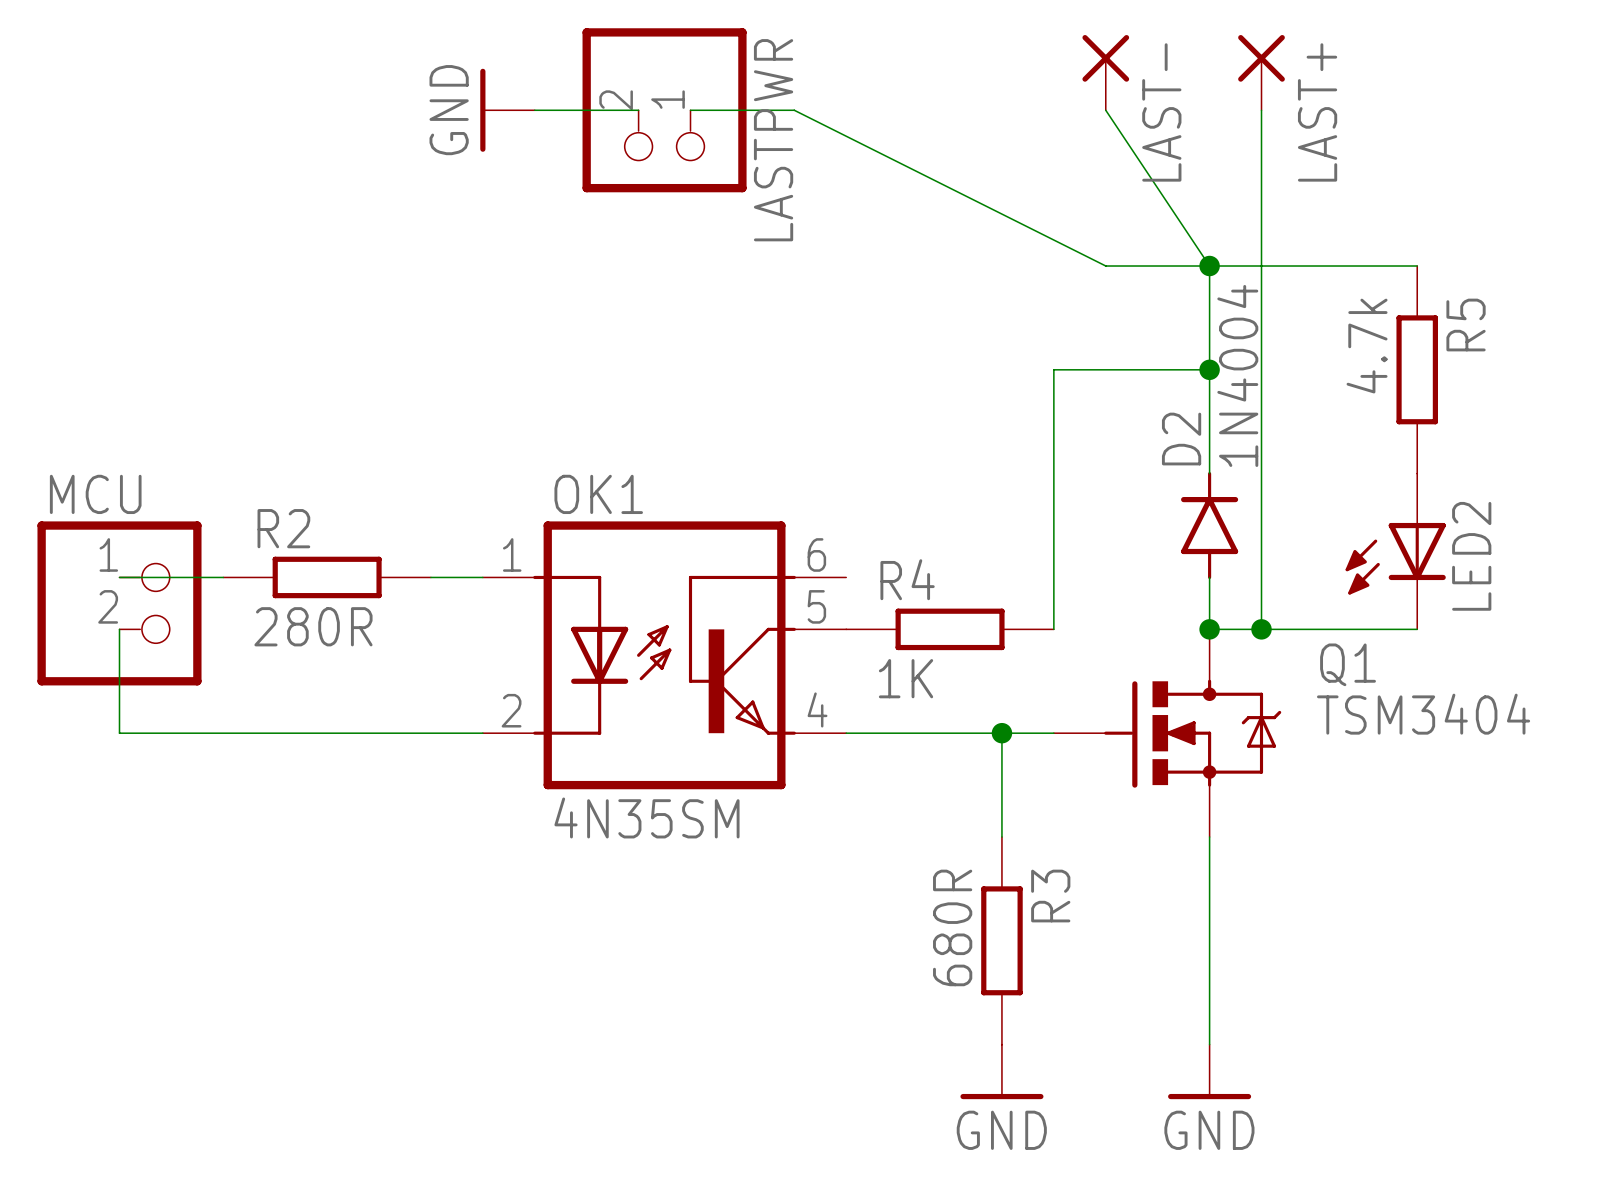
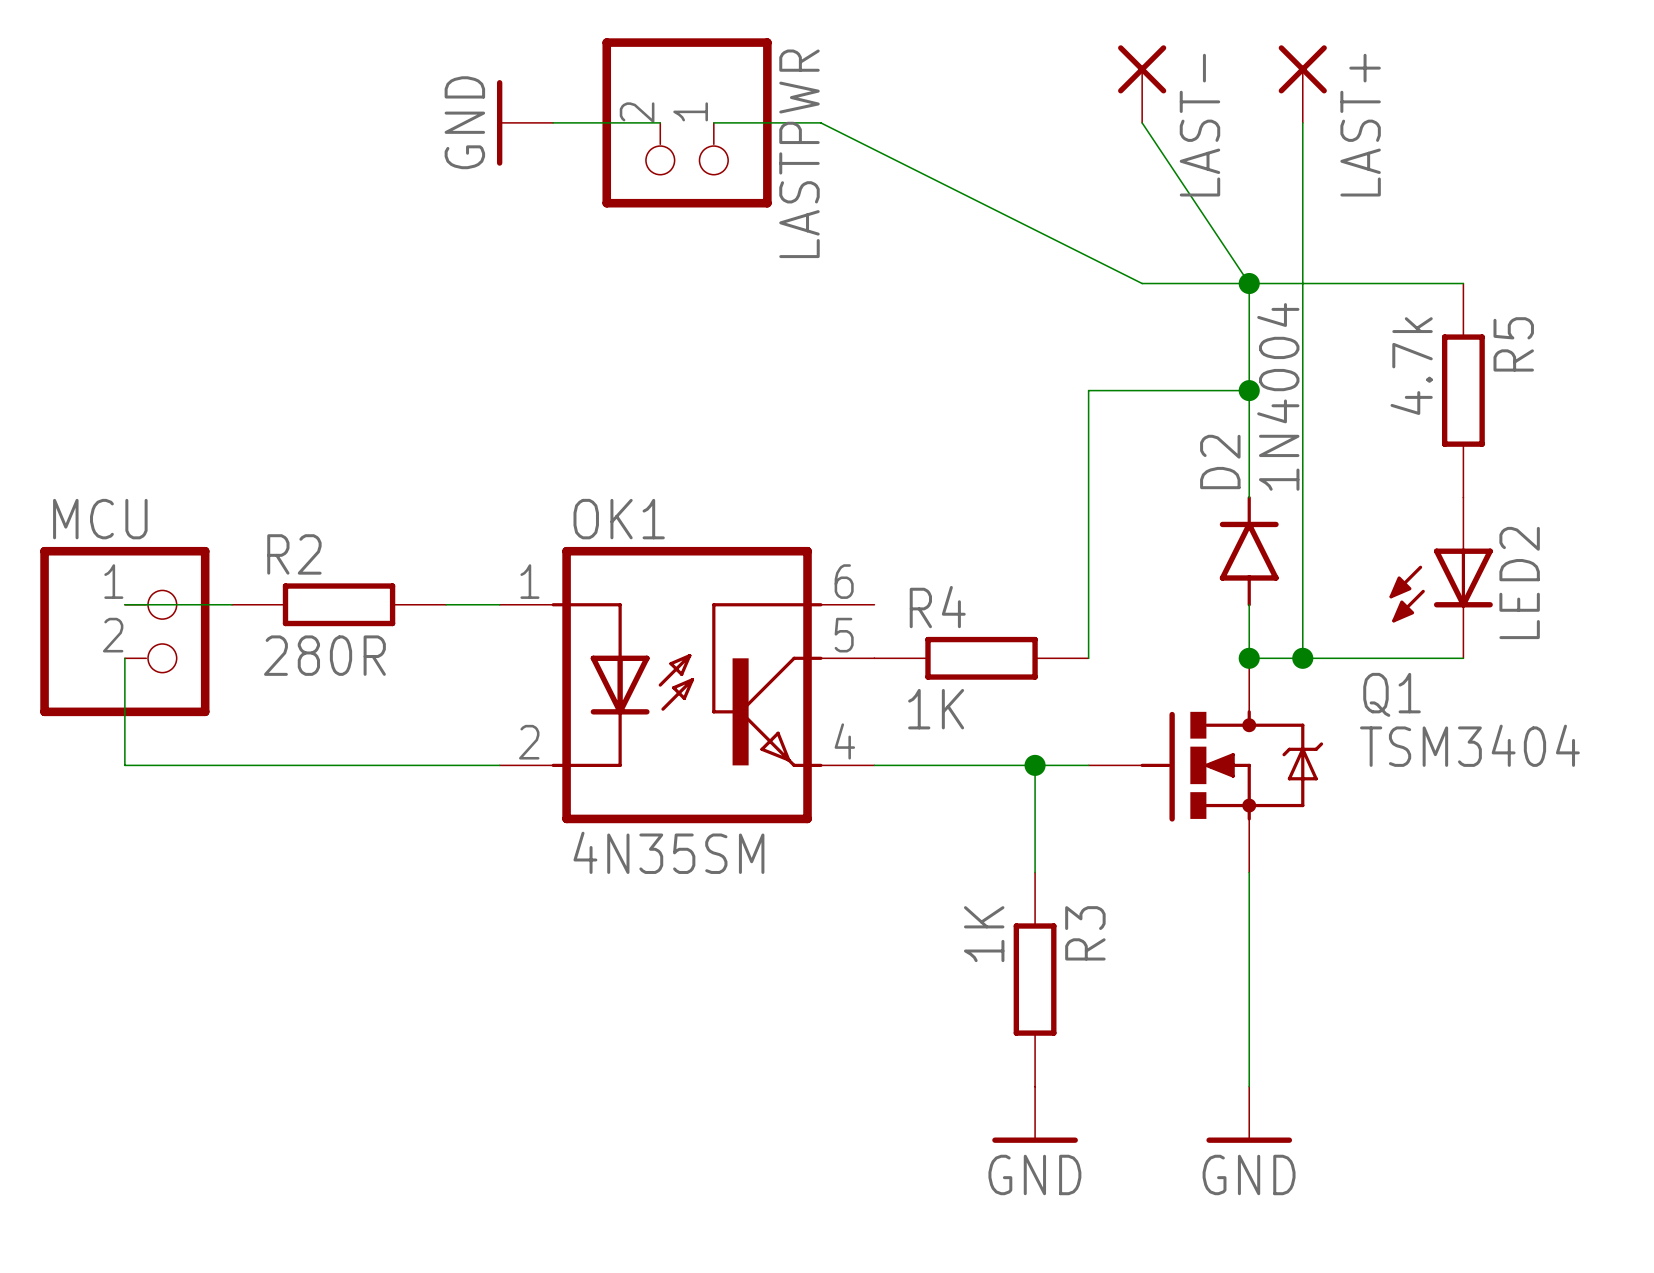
R3 value: 680R (952, 927) -> 1K (984, 934)

